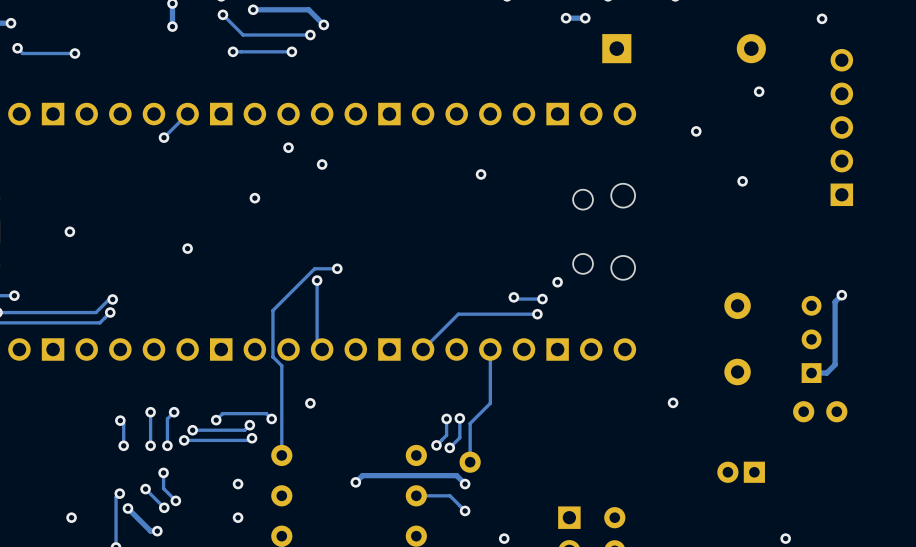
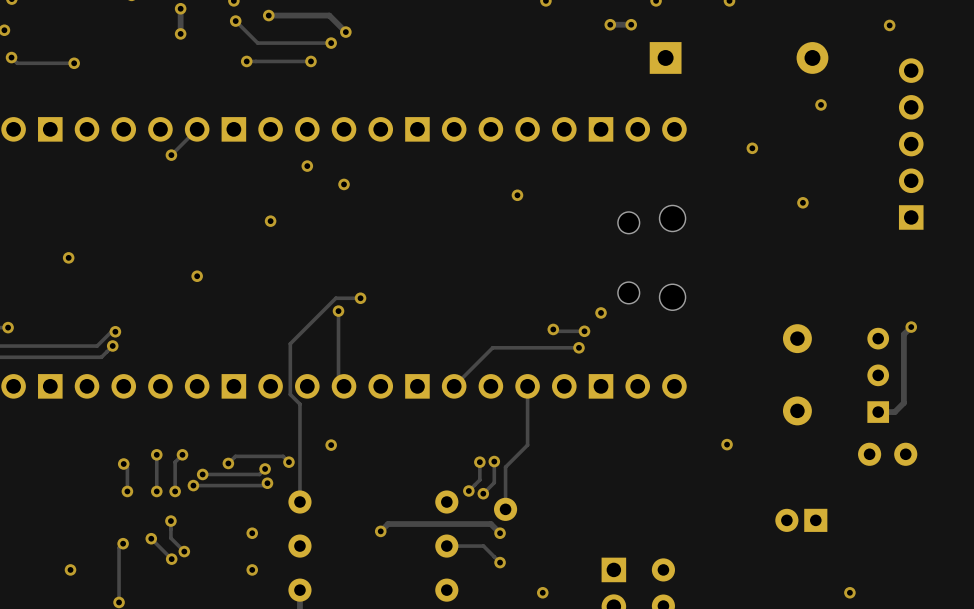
track: (127, 508) (150, 531) (157, 531) -> none
via: (127, 508) -> none
via: (157, 531) -> none

